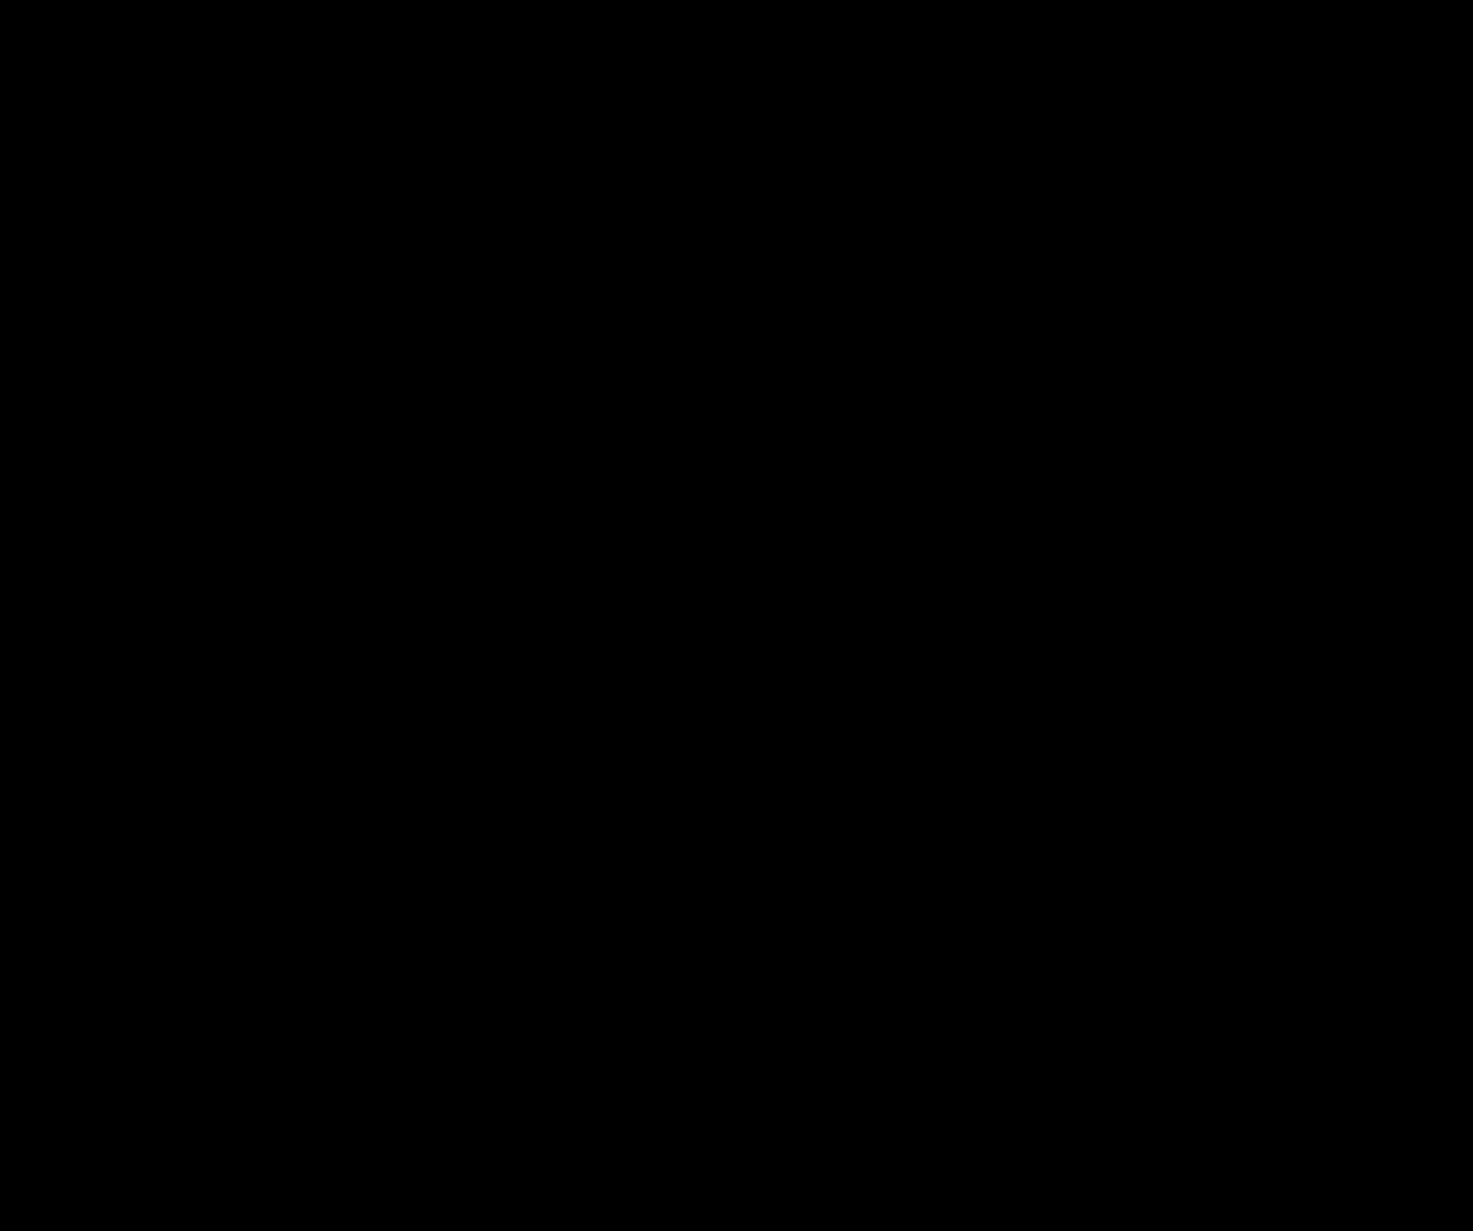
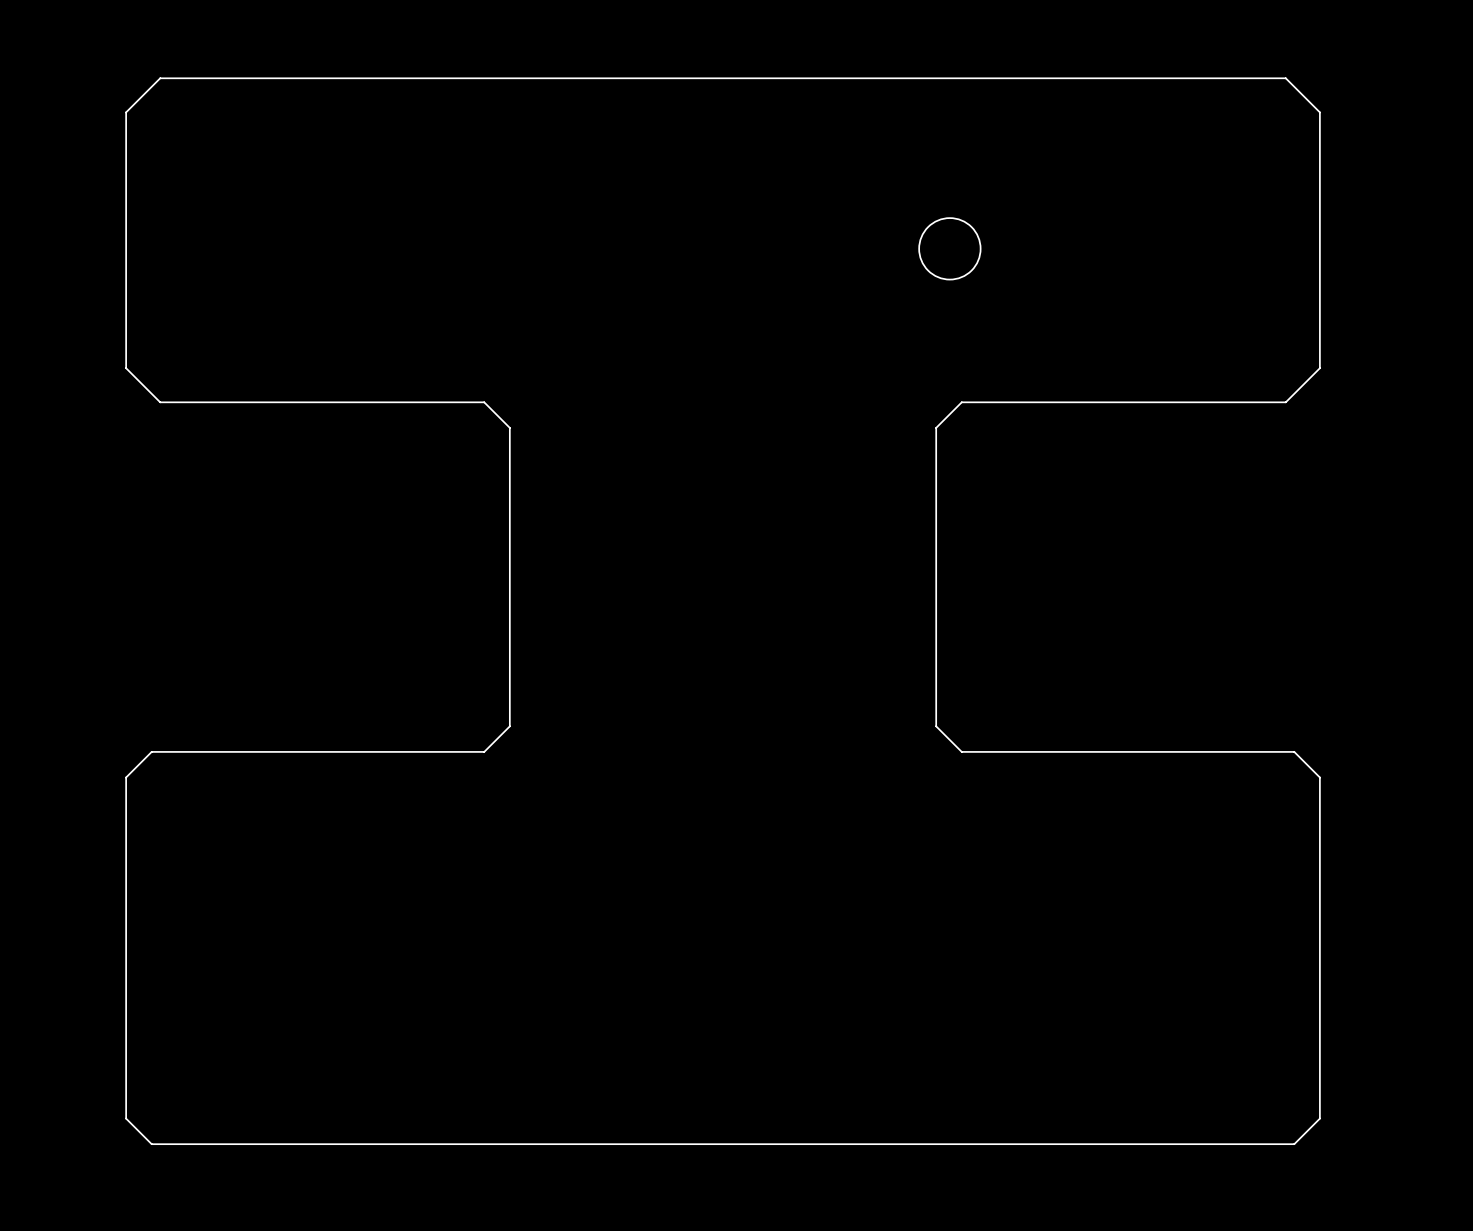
board edge: none -> (160, 78) (126, 112) (126, 368) (160, 402) (484, 402) (509, 427) (509, 726) (484, 751) (151, 751) (126, 777) (126, 1118) (151, 1144) (1294, 1144) (1319, 1118) (1319, 777) (1294, 751) (961, 751) (936, 726) (936, 427) (961, 402) (1285, 402) (1319, 368) (1319, 112) (1285, 78) (160, 78)
round board edge: none -> [918, 217, 982, 281]

